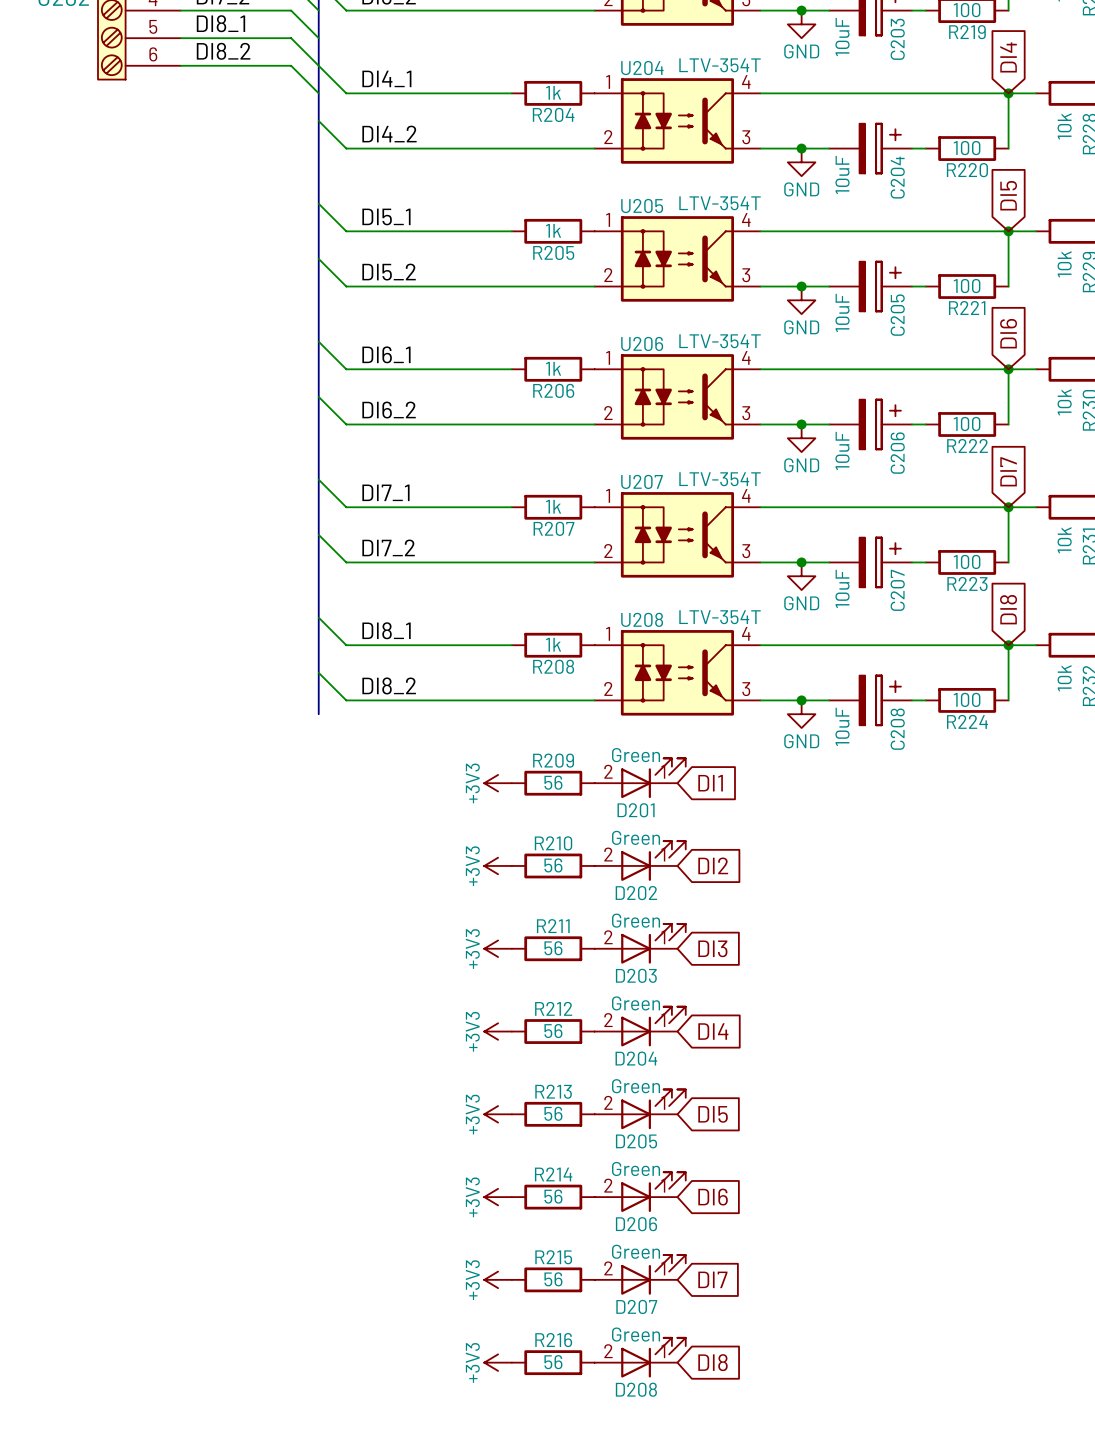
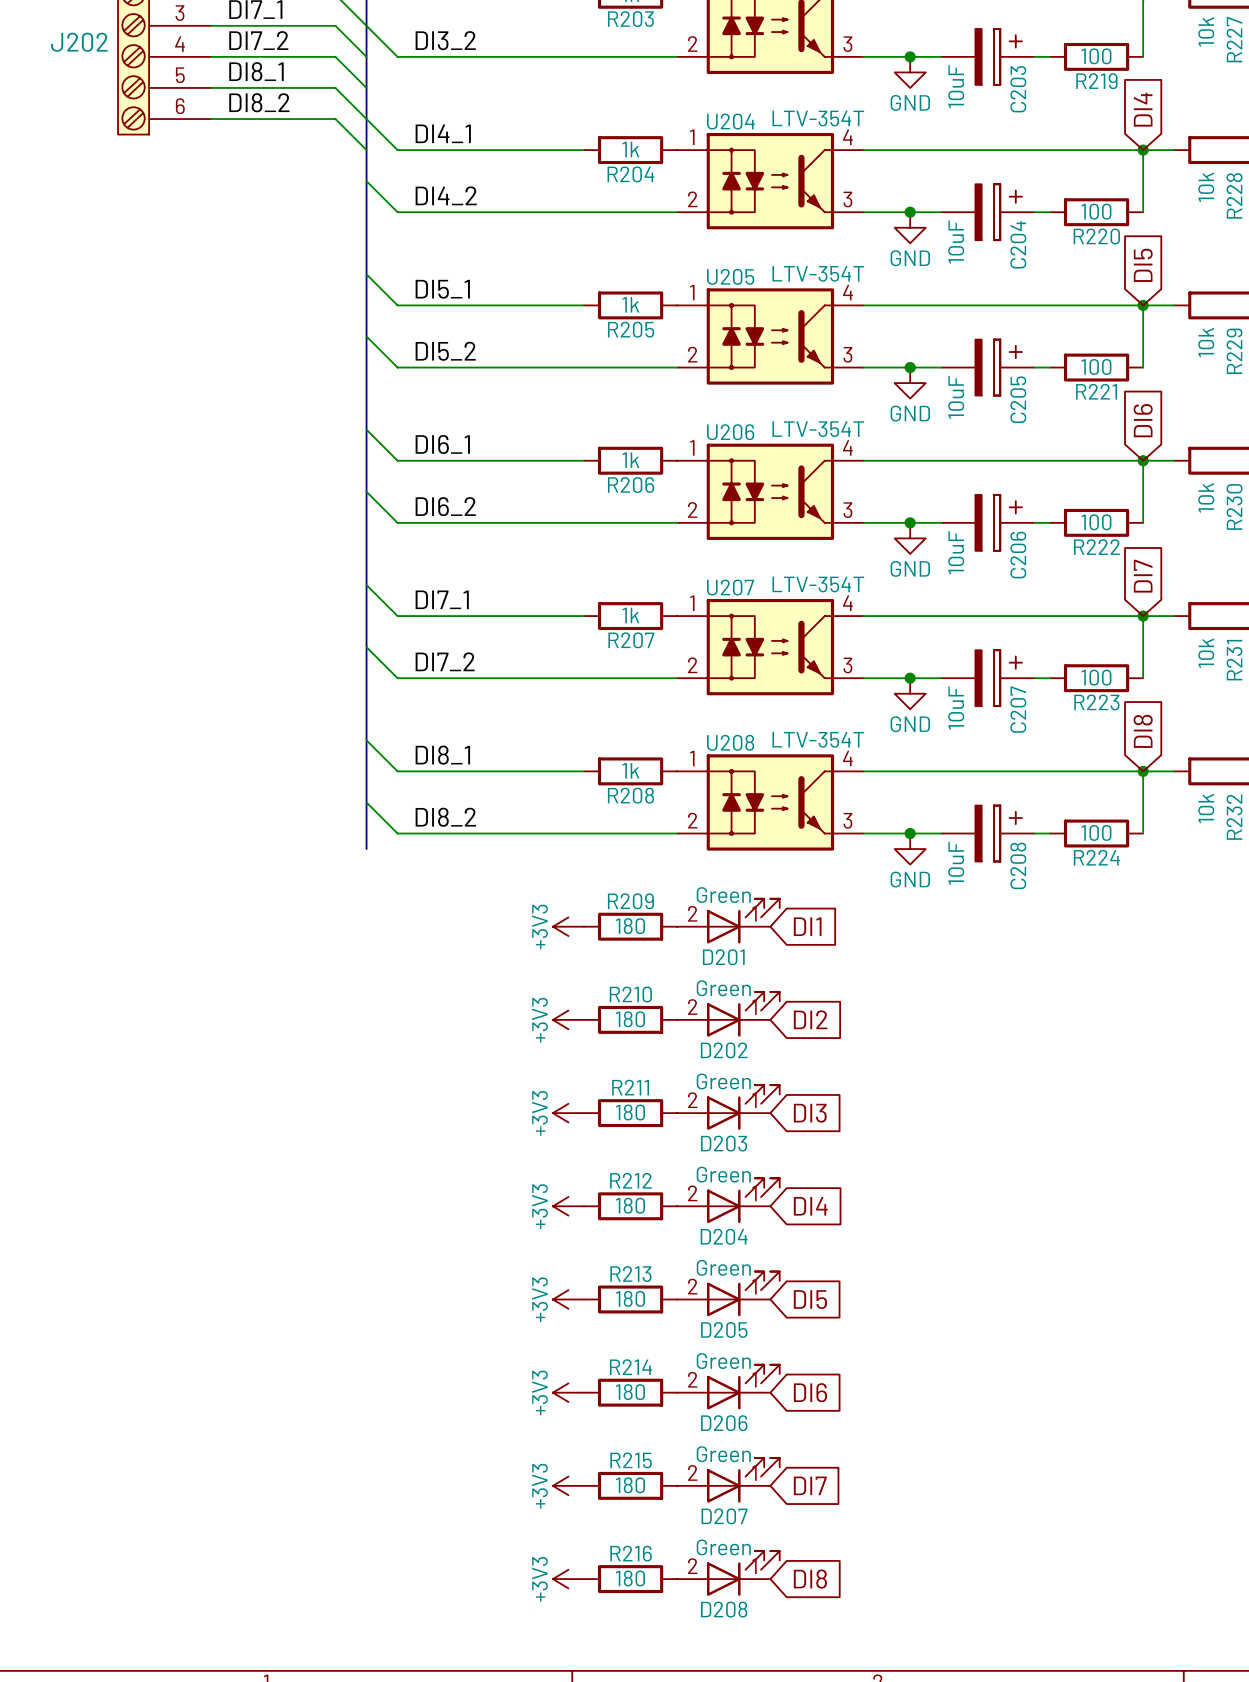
R209 value: 56 (553, 782) -> 180 (630, 926)
R210 value: 56 (553, 865) -> 180 (630, 1019)
R211 value: 56 (553, 948) -> 180 (630, 1112)
R212 value: 56 (553, 1031) -> 180 (630, 1205)
R213 value: 56 (553, 1113) -> 180 (630, 1298)
R214 value: 56 (553, 1196) -> 180 (630, 1392)
R215 value: 56 (553, 1279) -> 180 (630, 1485)
R216 value: 56 (553, 1362) -> 180 (630, 1578)

